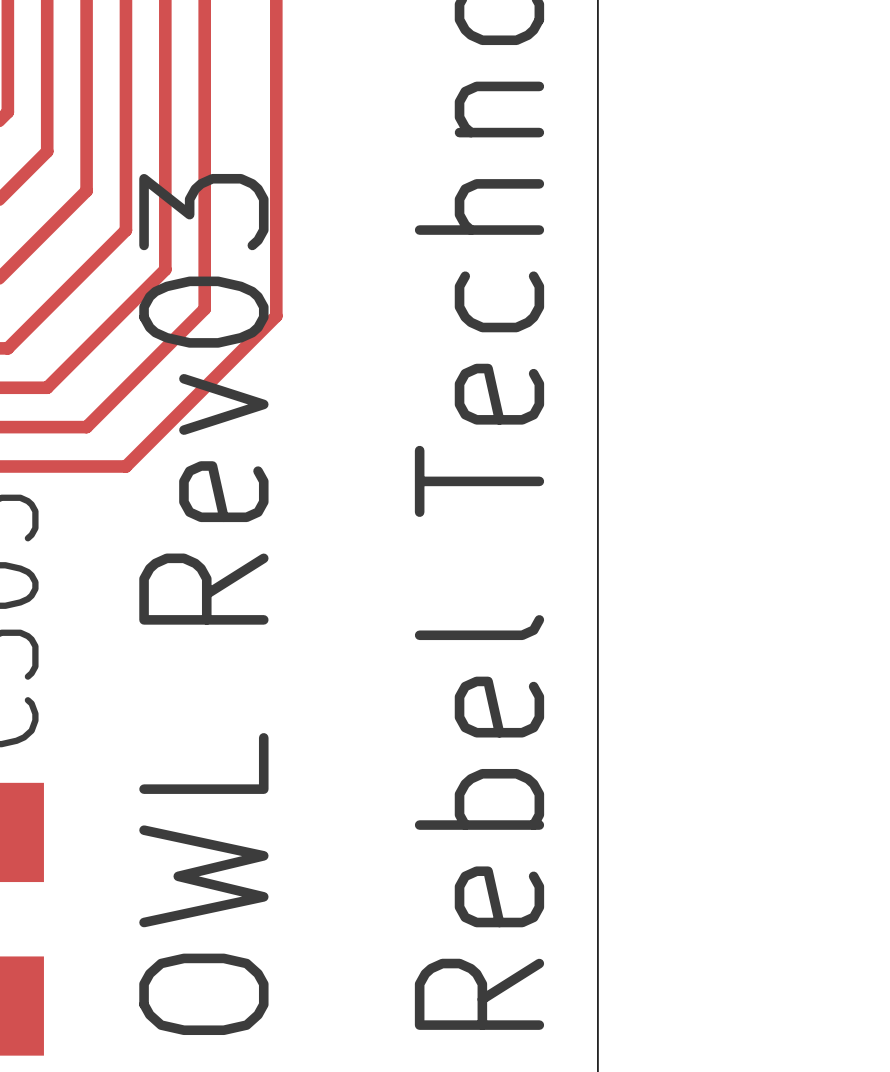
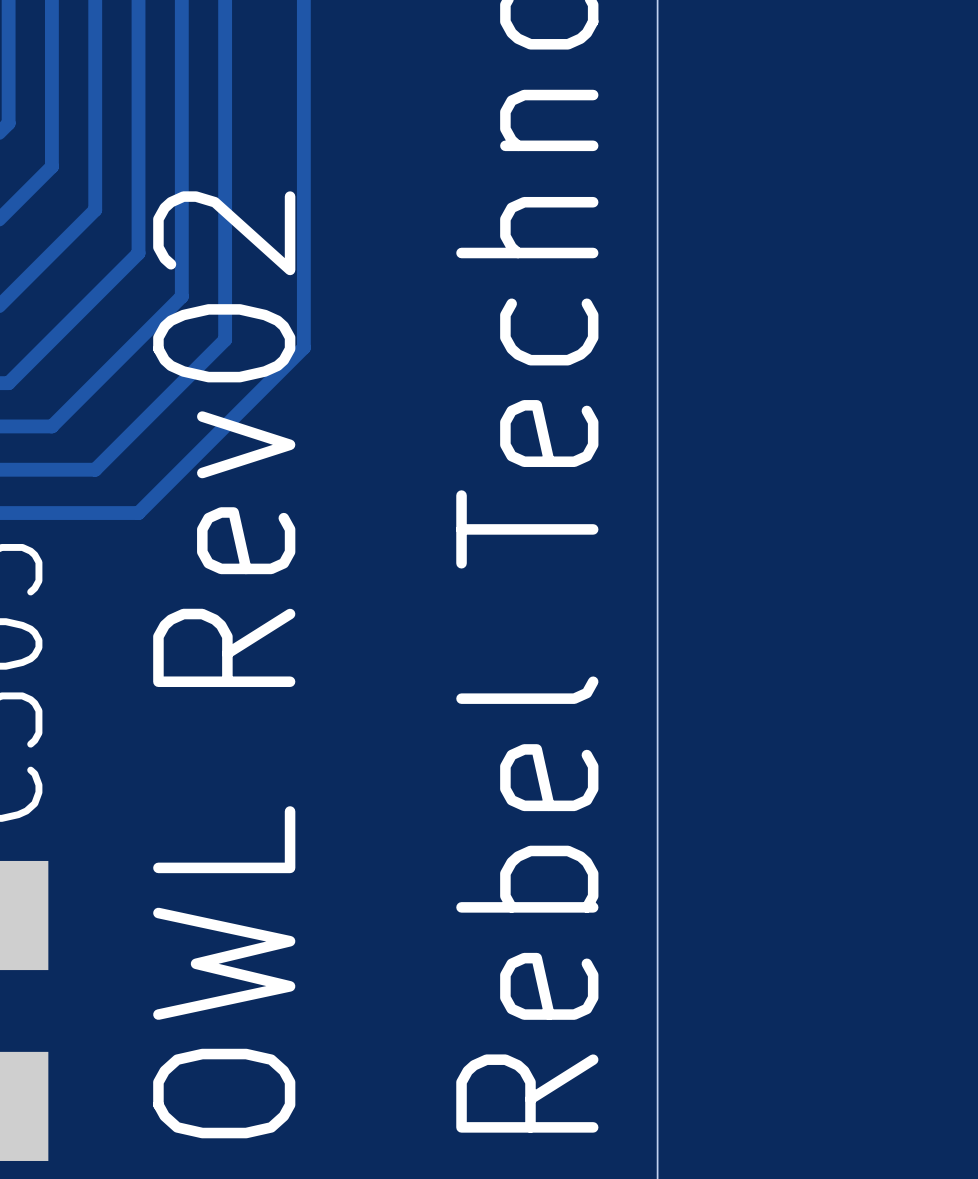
text: OWL Rev03 (203, 604) -> OWL Rev02 (224, 664)

